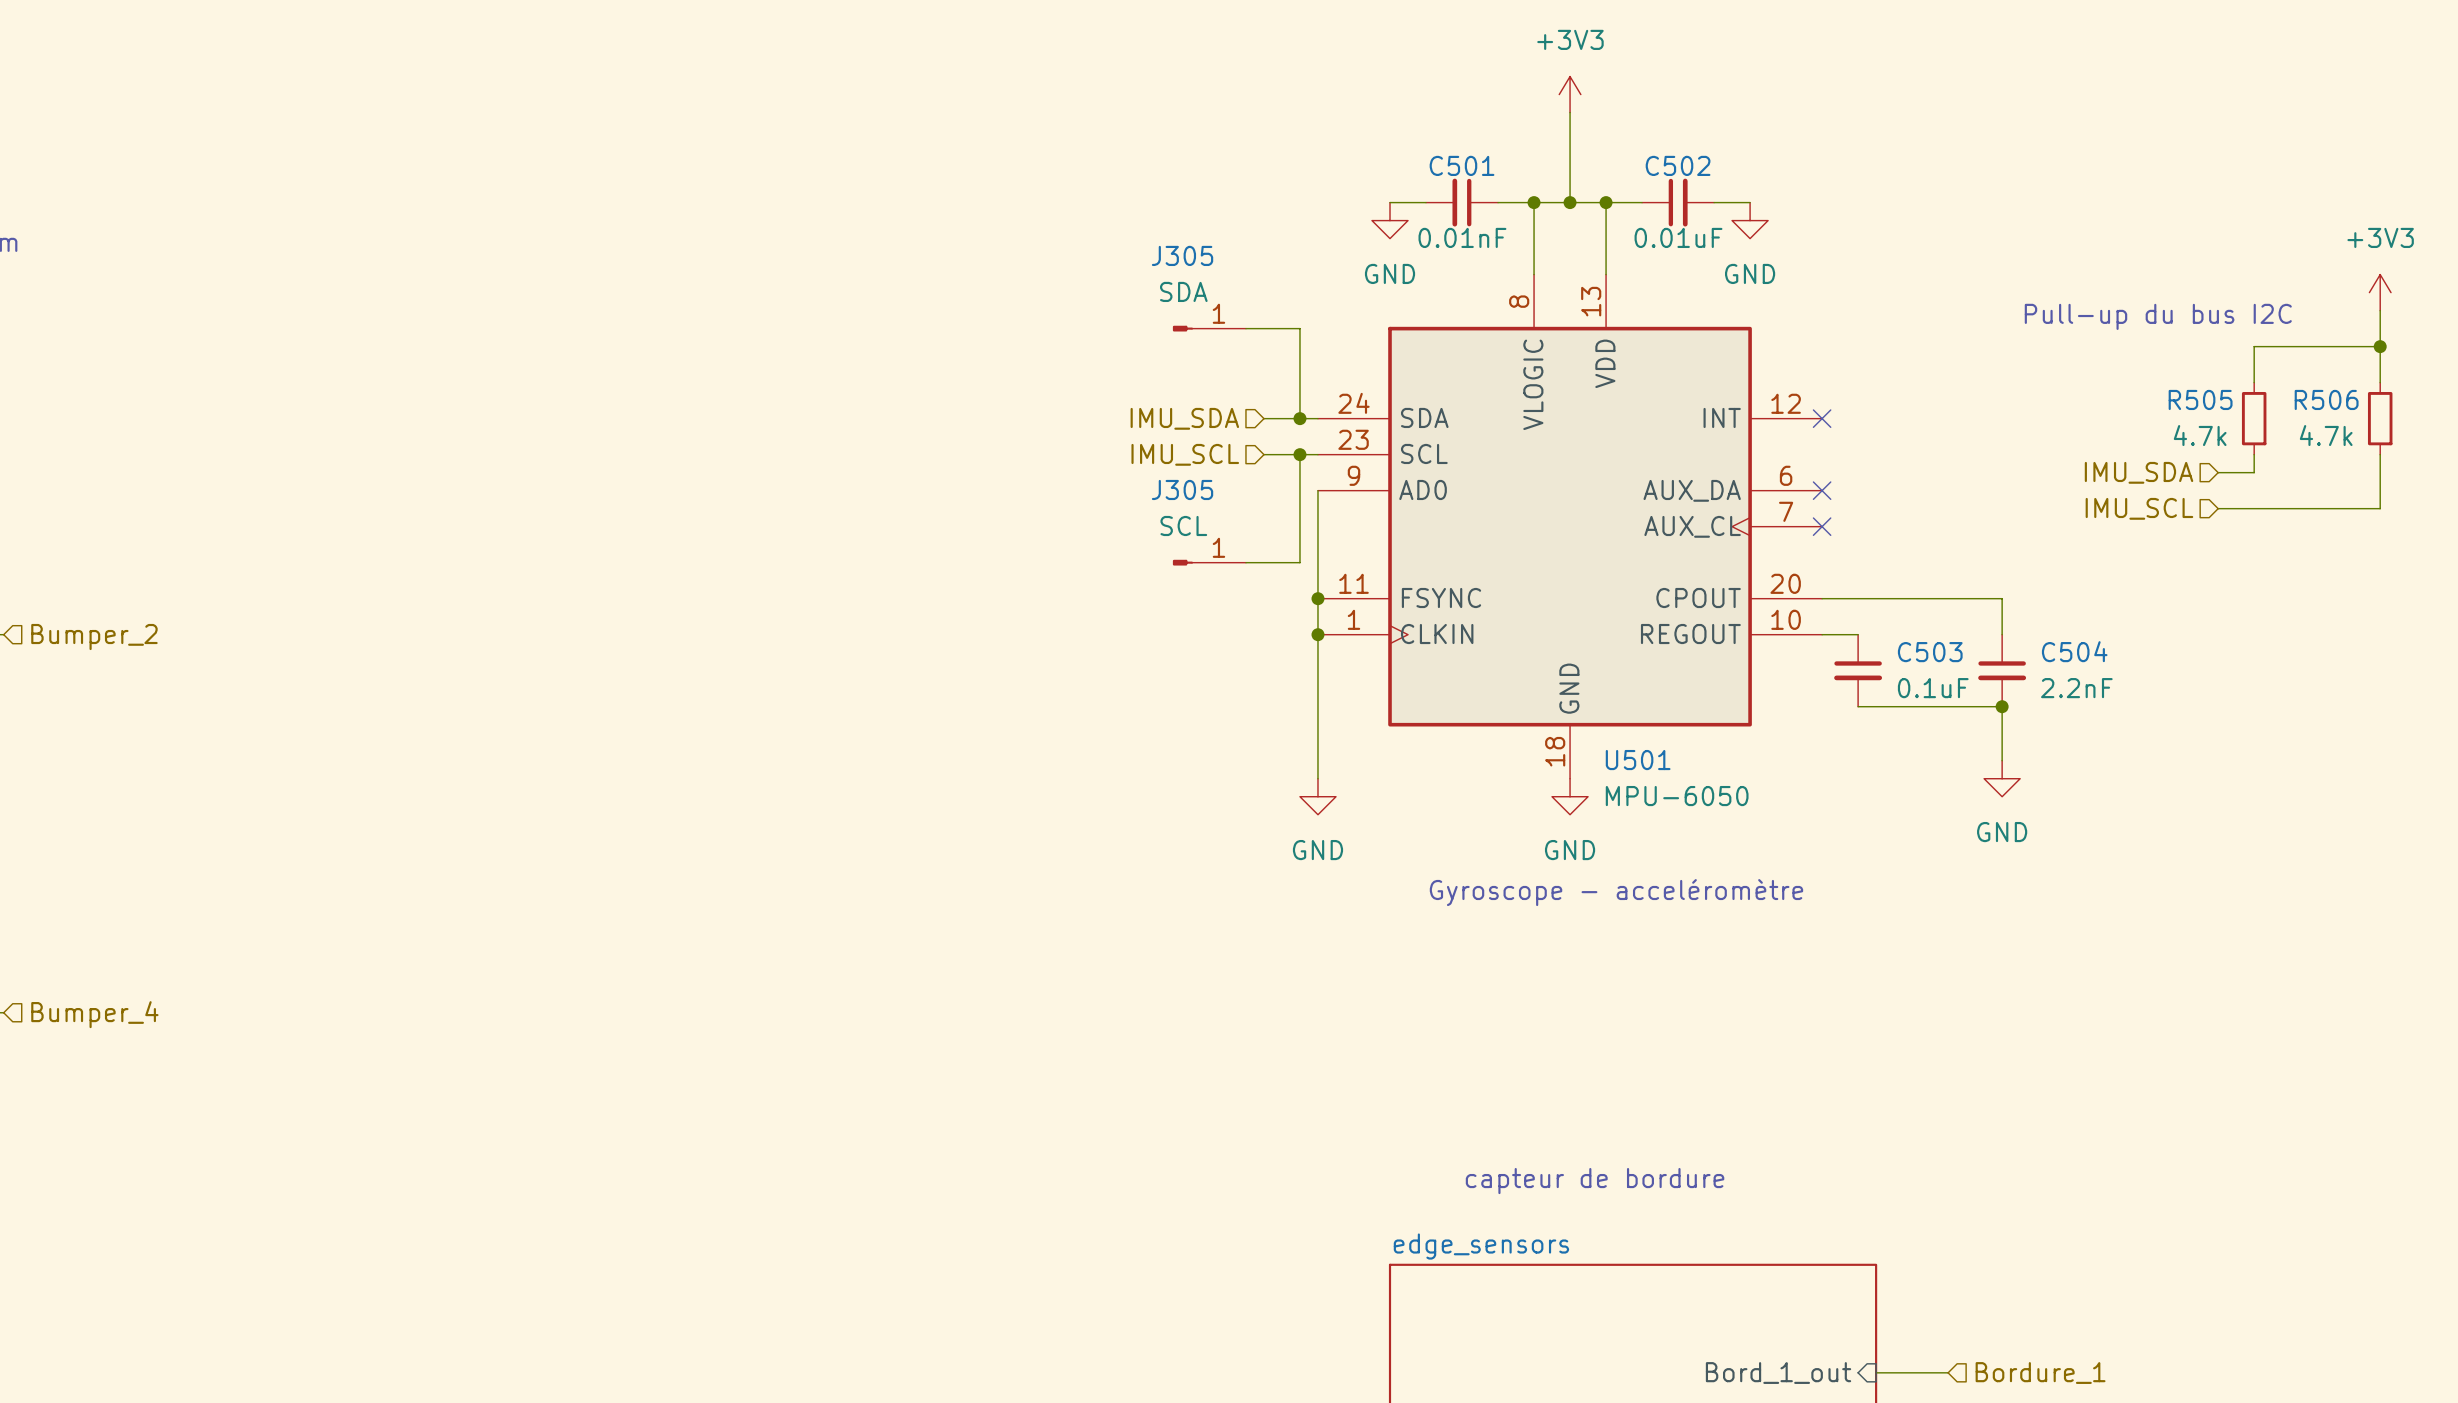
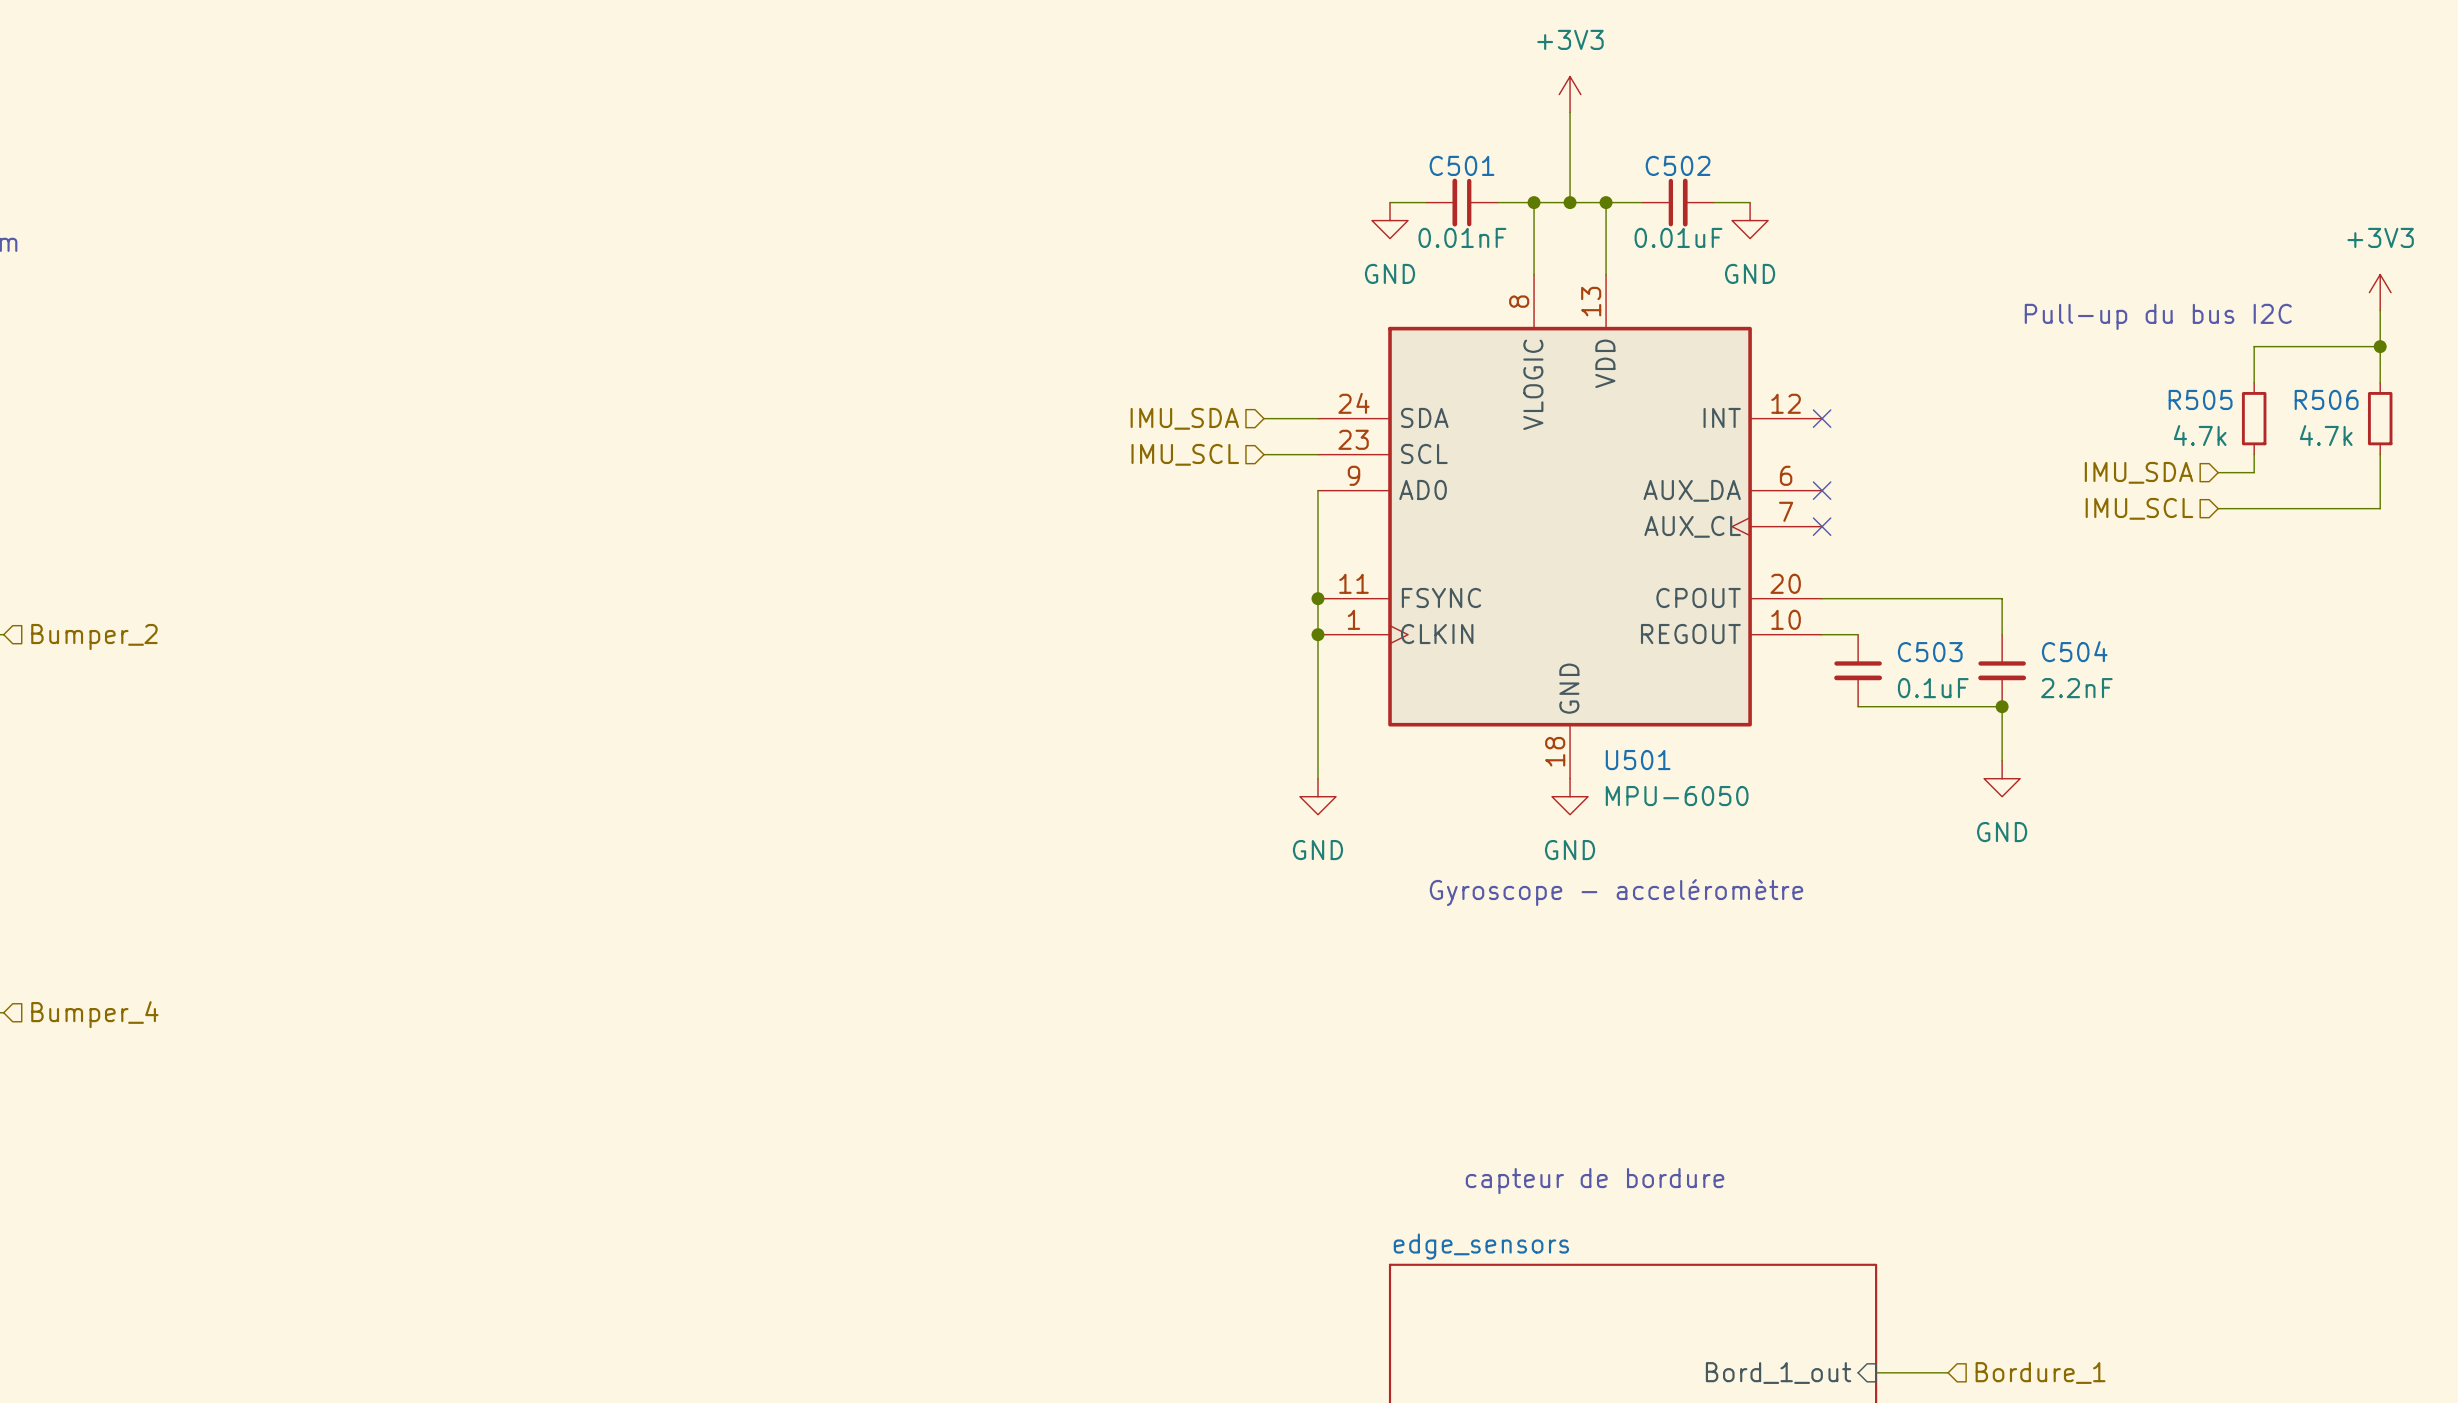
J305: SDA (1209, 328) -> none
wire: (1245, 328) (1299, 328) (1299, 418) -> none
junction: (1299, 418) -> none
wire: (1299, 454) (1299, 562) (1245, 562) -> none
junction: (1299, 454) -> none
J305: SCL (1209, 562) -> none

